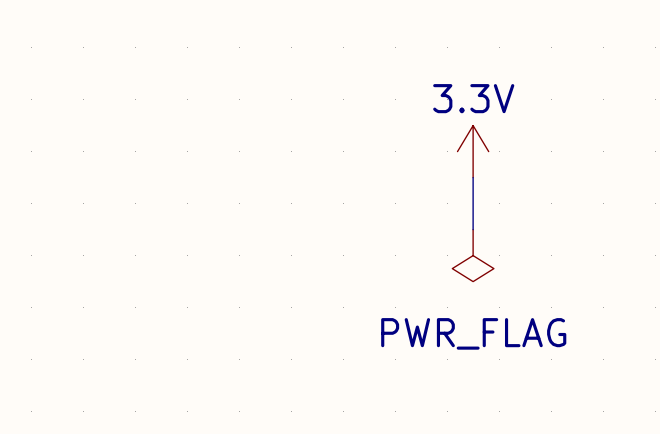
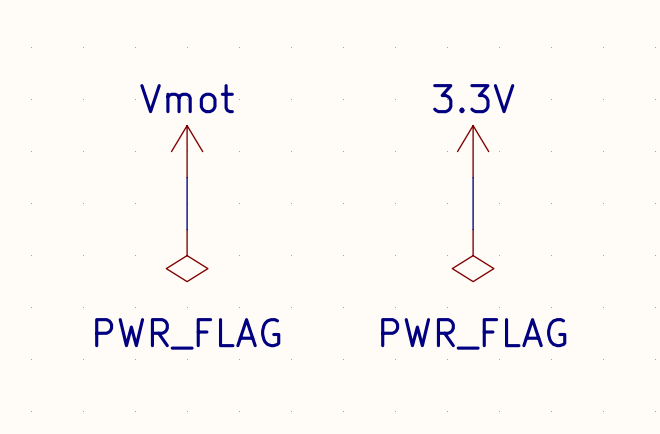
power symbol: none -> Vmot (187, 151)
wire: none -> (187, 177) (187, 229)
power symbol: none -> PWR_FLAG (187, 255)

